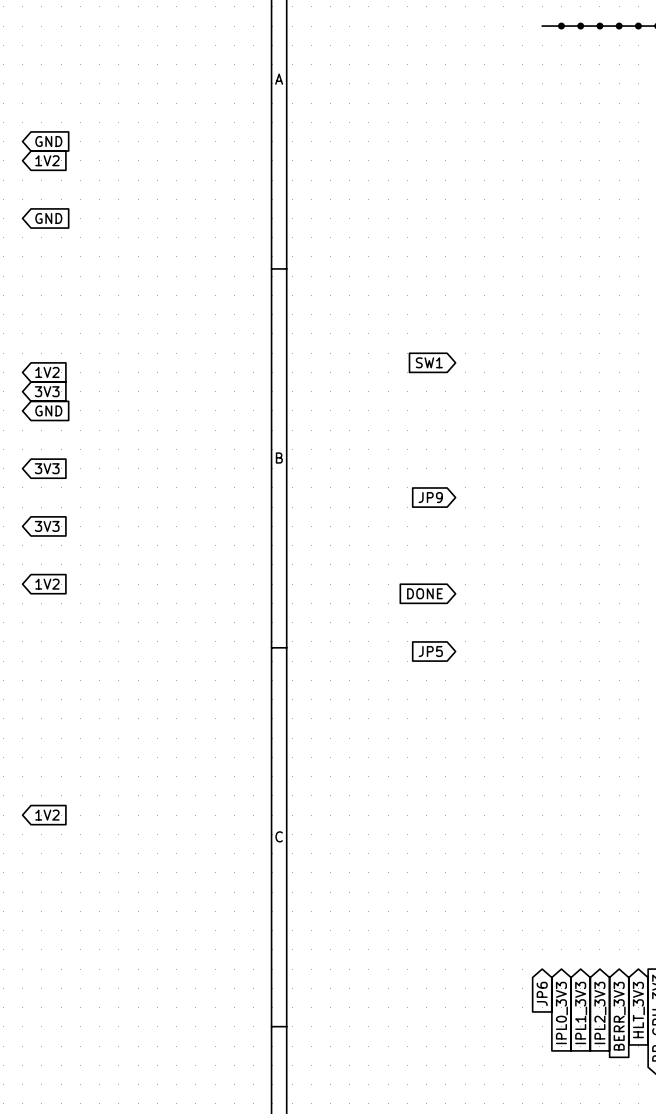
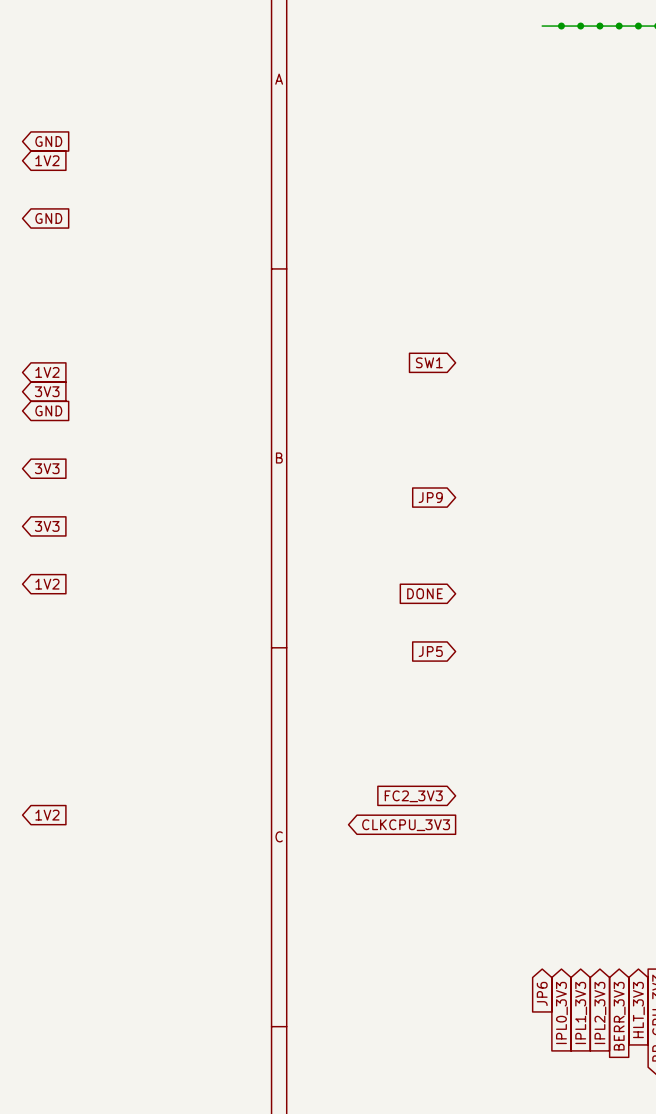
global label: none -> FC2_3V3 (413, 796)
global label: none -> CLKCPU_3V3 (406, 825)

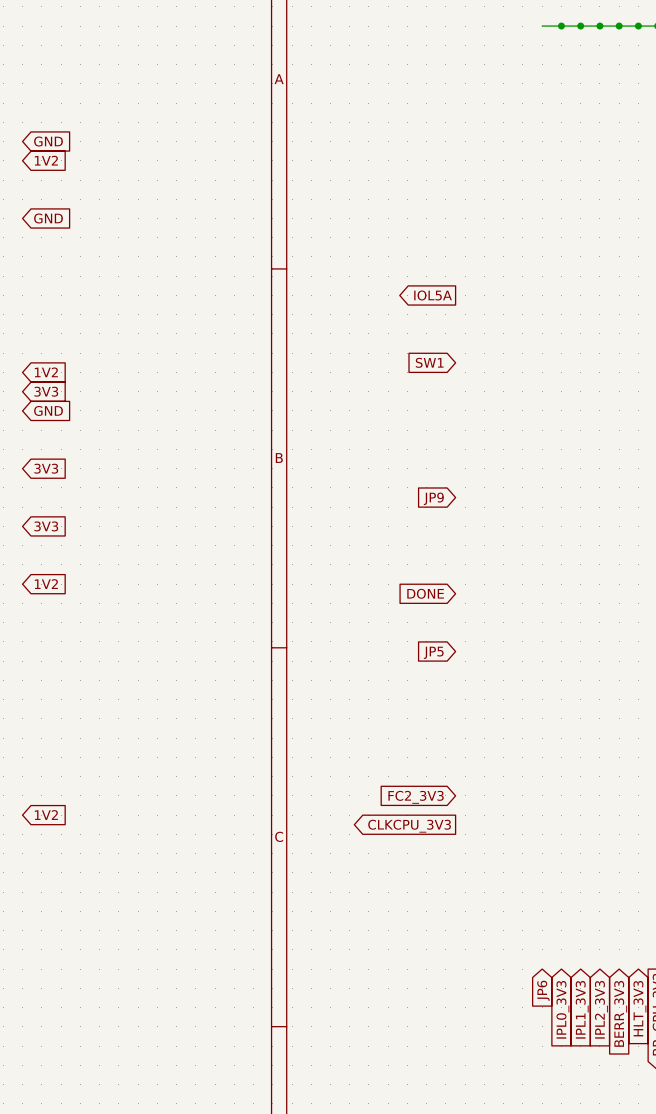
global label: none -> IOL5A (433, 295)

